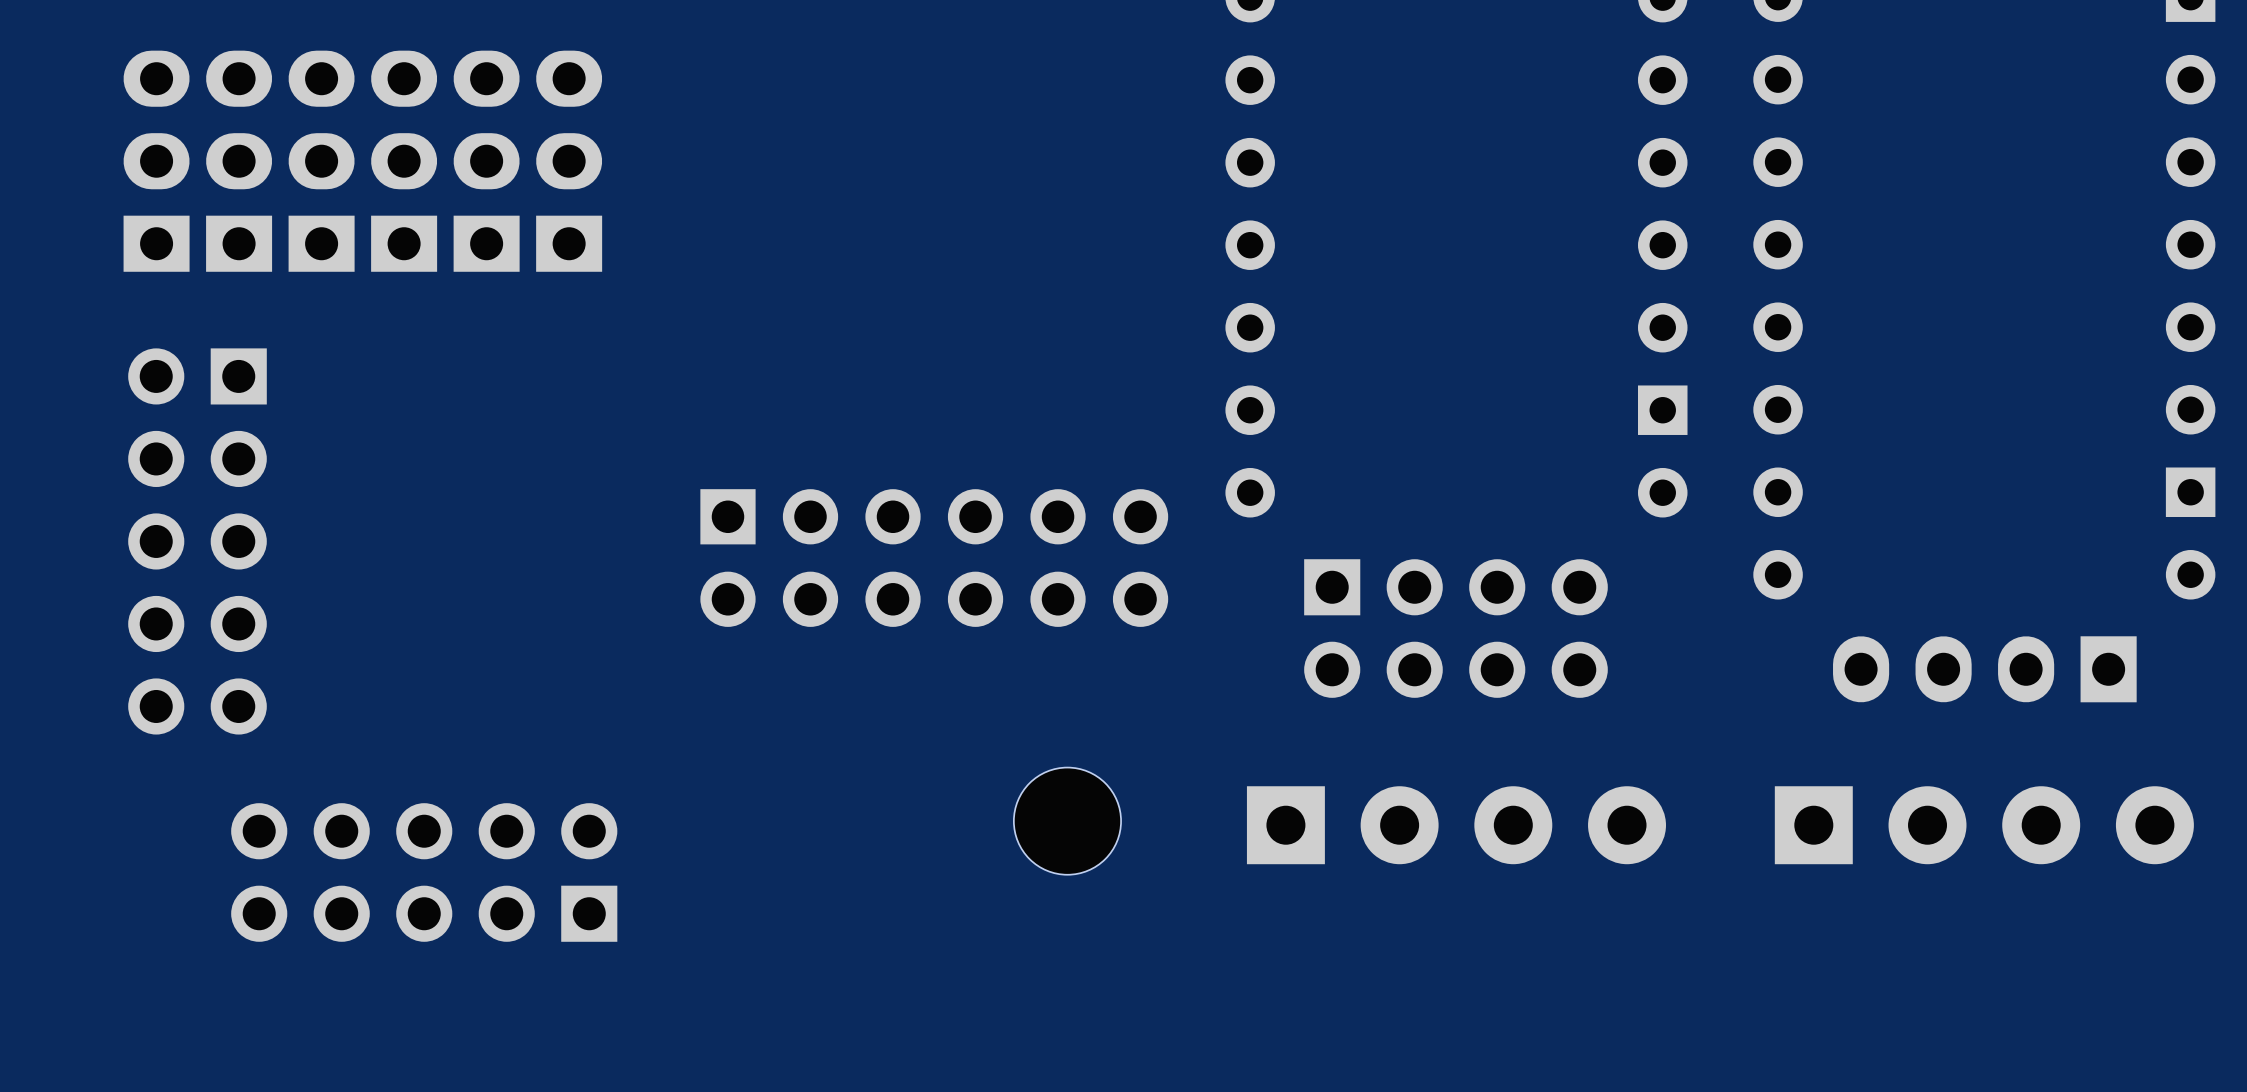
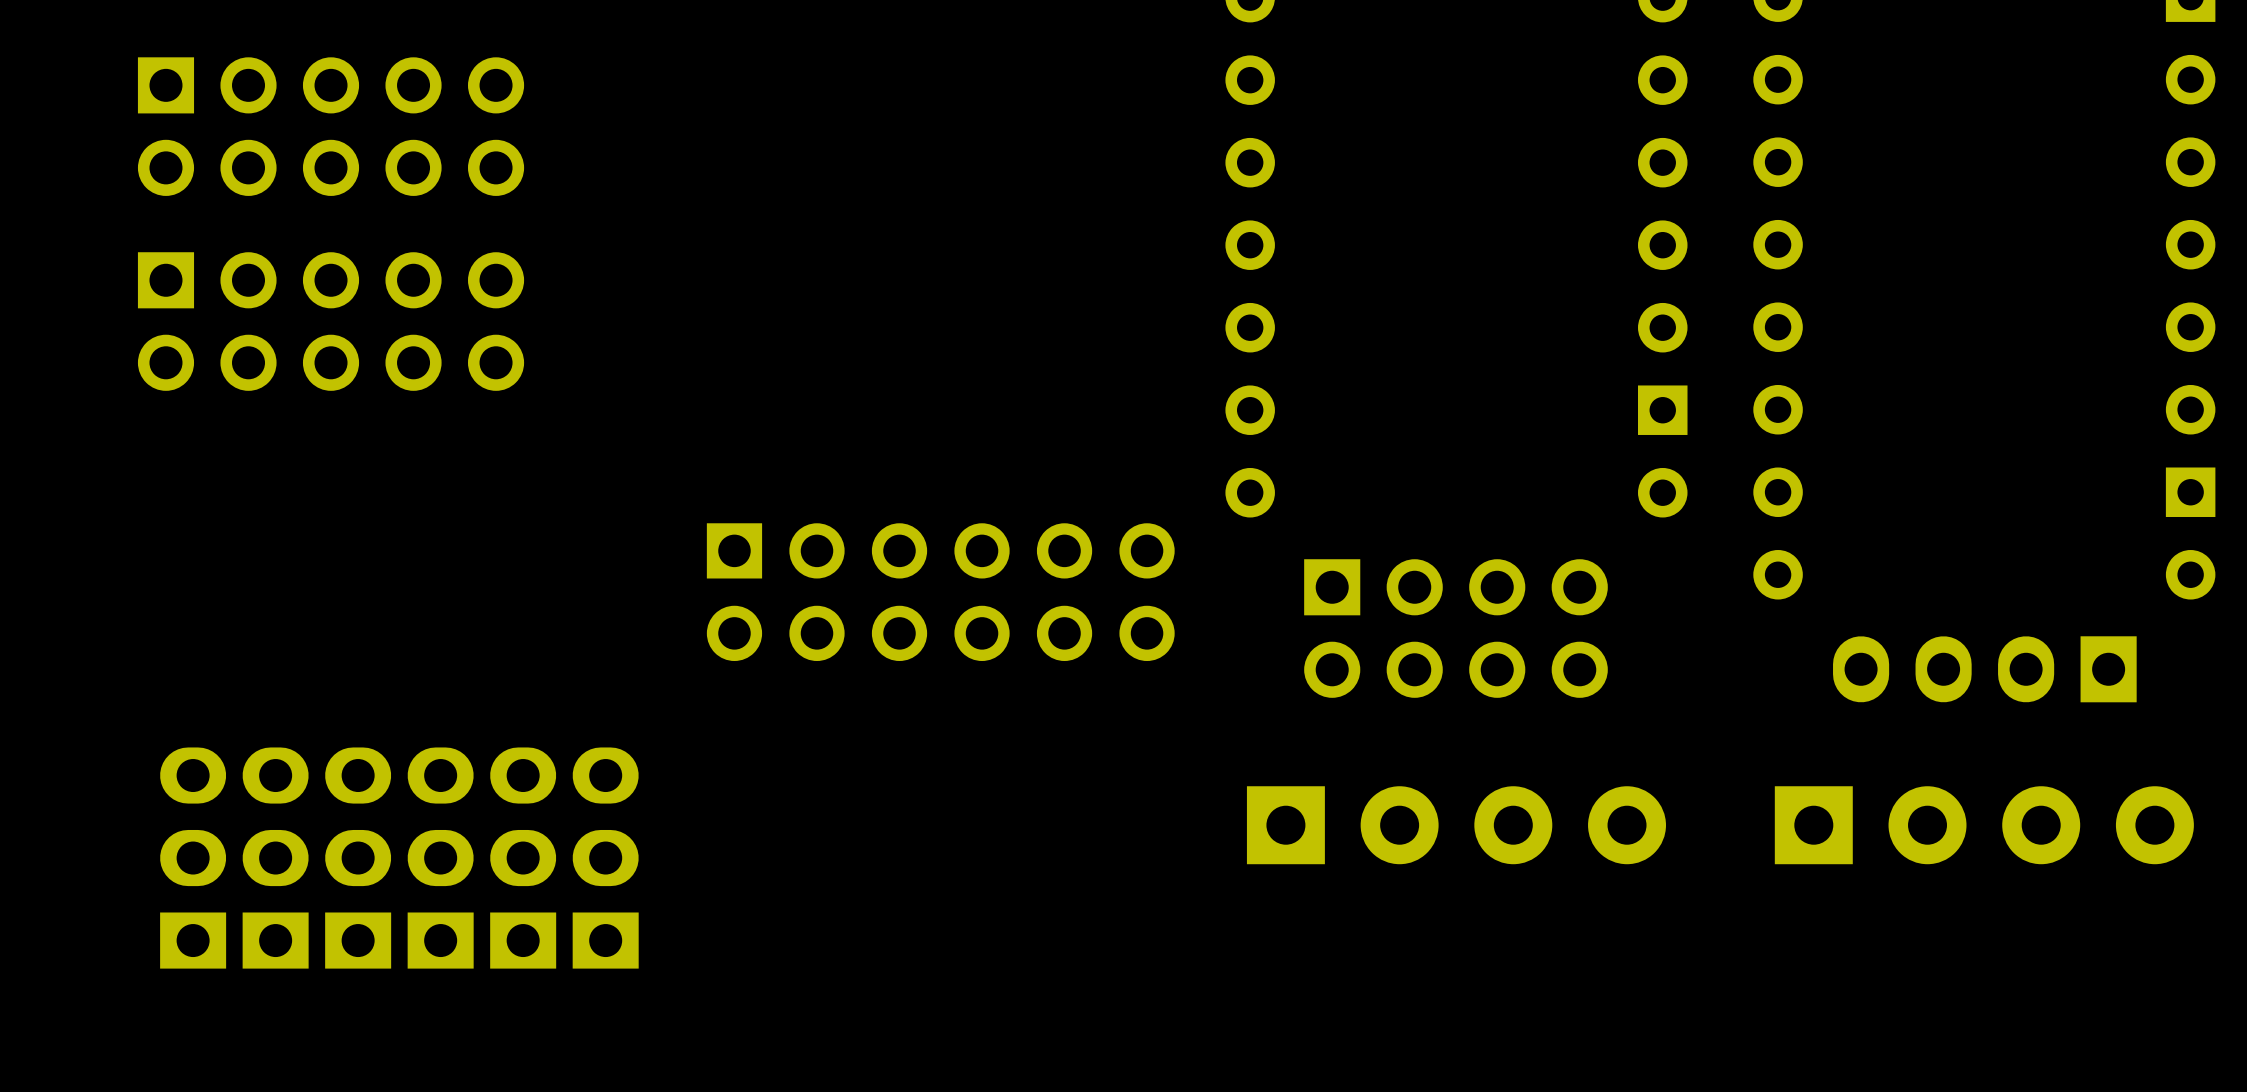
part: none -> (331, 126)
part: (156, 161) -> none
part: (239, 161) -> none
part: (321, 161) -> none
part: (404, 161) -> none
part: (486, 161) -> none
part: (569, 161) -> none
part: none -> (331, 321)
part: (197, 541) -> none
part position: (934, 558) -> (940, 592)
part footprint: [231, 803, 618, 942] -> [407, 747, 474, 969]
part: (1067, 821) -> none
part: none -> (193, 858)
part: none -> (275, 858)
part: none -> (358, 858)
part: none -> (523, 858)
part: none -> (605, 858)

